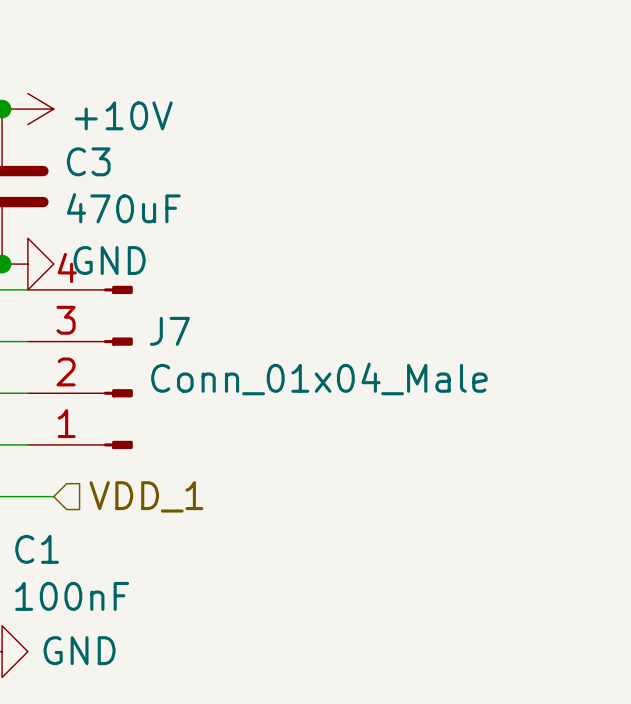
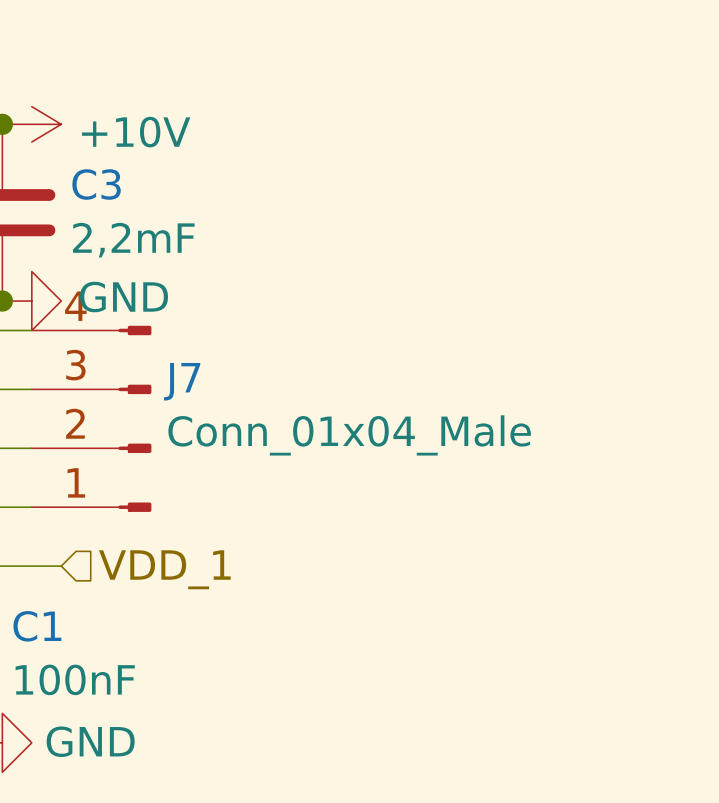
C3 value: 470uF (123, 208) -> 2,2mF (133, 240)

